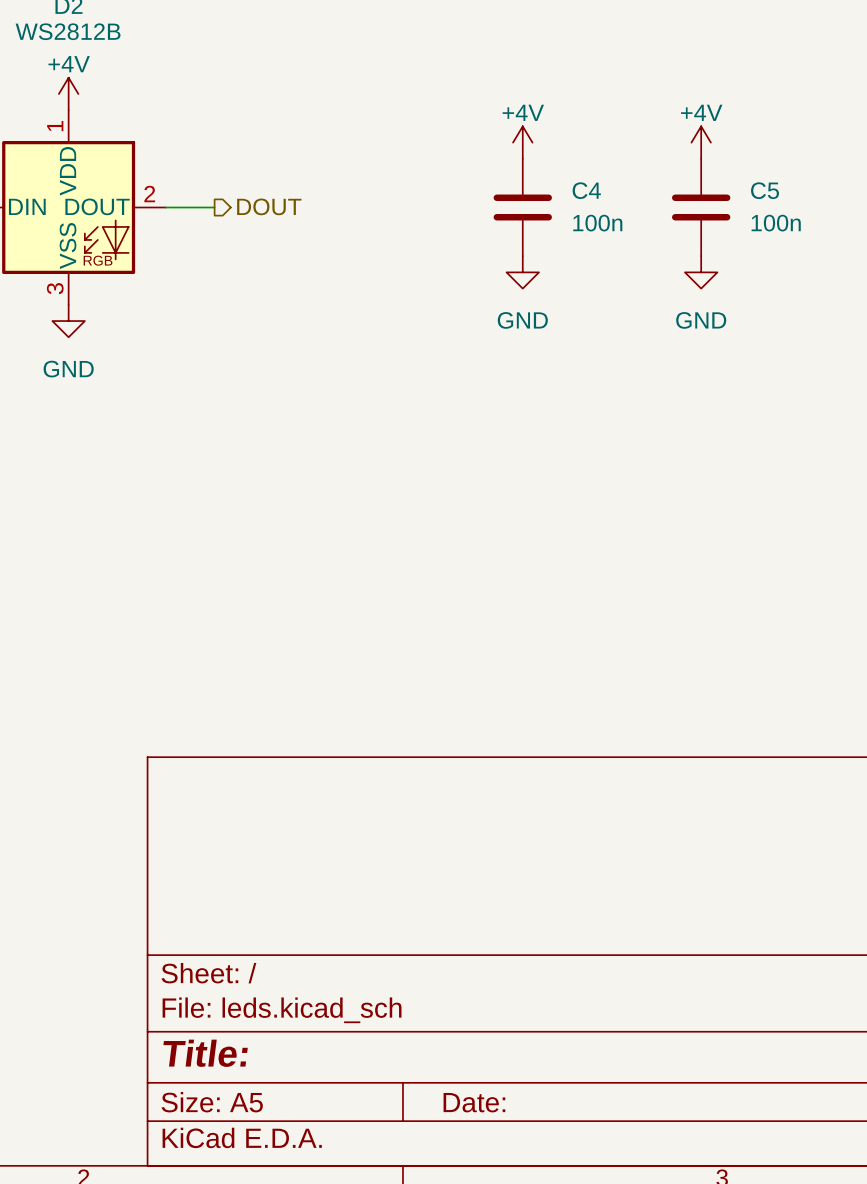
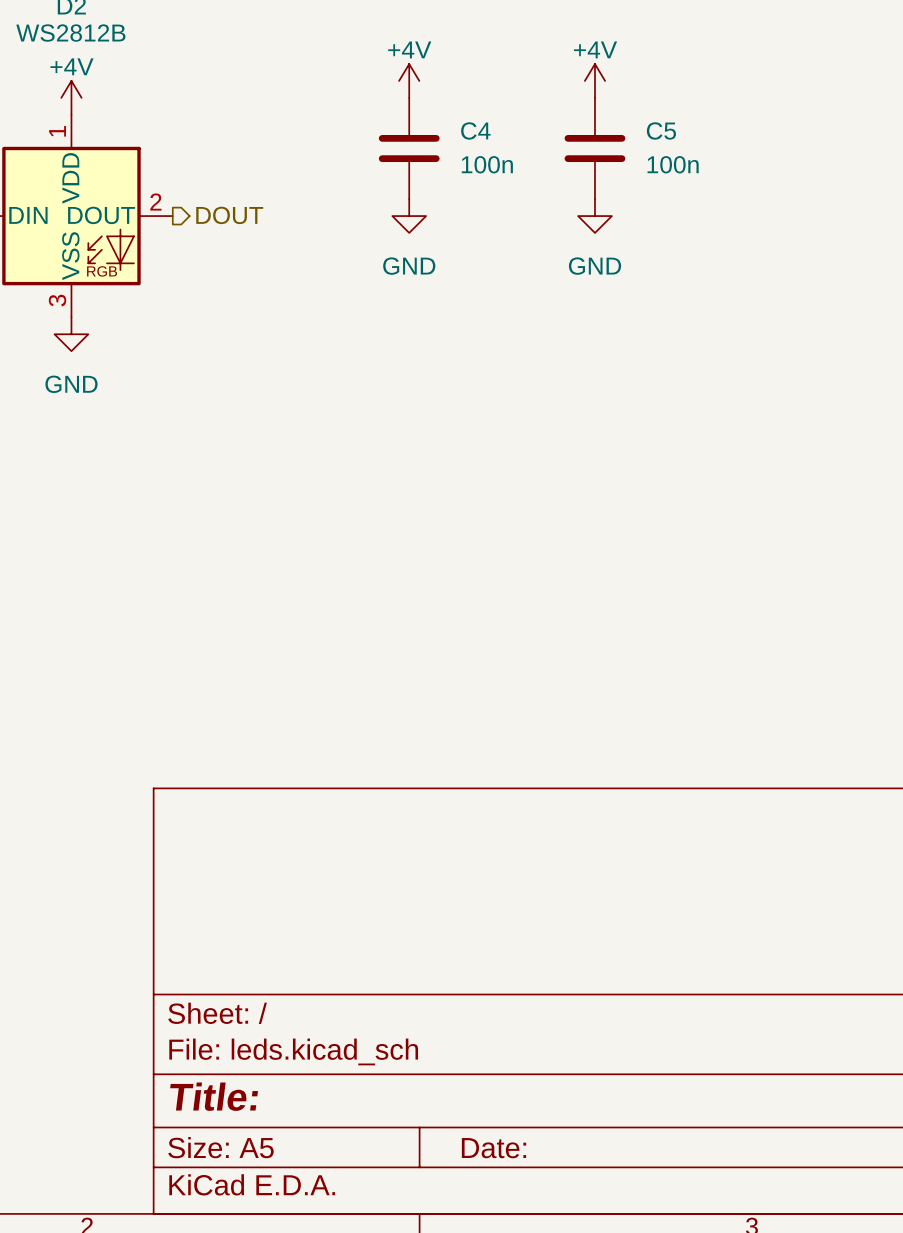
power symbol: none -> +4V (409, 80)
power symbol: none -> +4V (594, 80)
power symbol: +4V (522, 142) -> none
power symbol: +4V (701, 142) -> none
hierarchical label position: DOUT (269, 206) -> DOUT (229, 215)
wire: (165, 207) (214, 207) -> none
power symbol: none -> GND (409, 216)
C4 position: (522, 207) -> (409, 148)
power symbol: none -> GND (594, 216)
C5 position: (701, 207) -> (594, 148)
power symbol: GND (522, 272) -> none
power symbol: GND (701, 272) -> none

